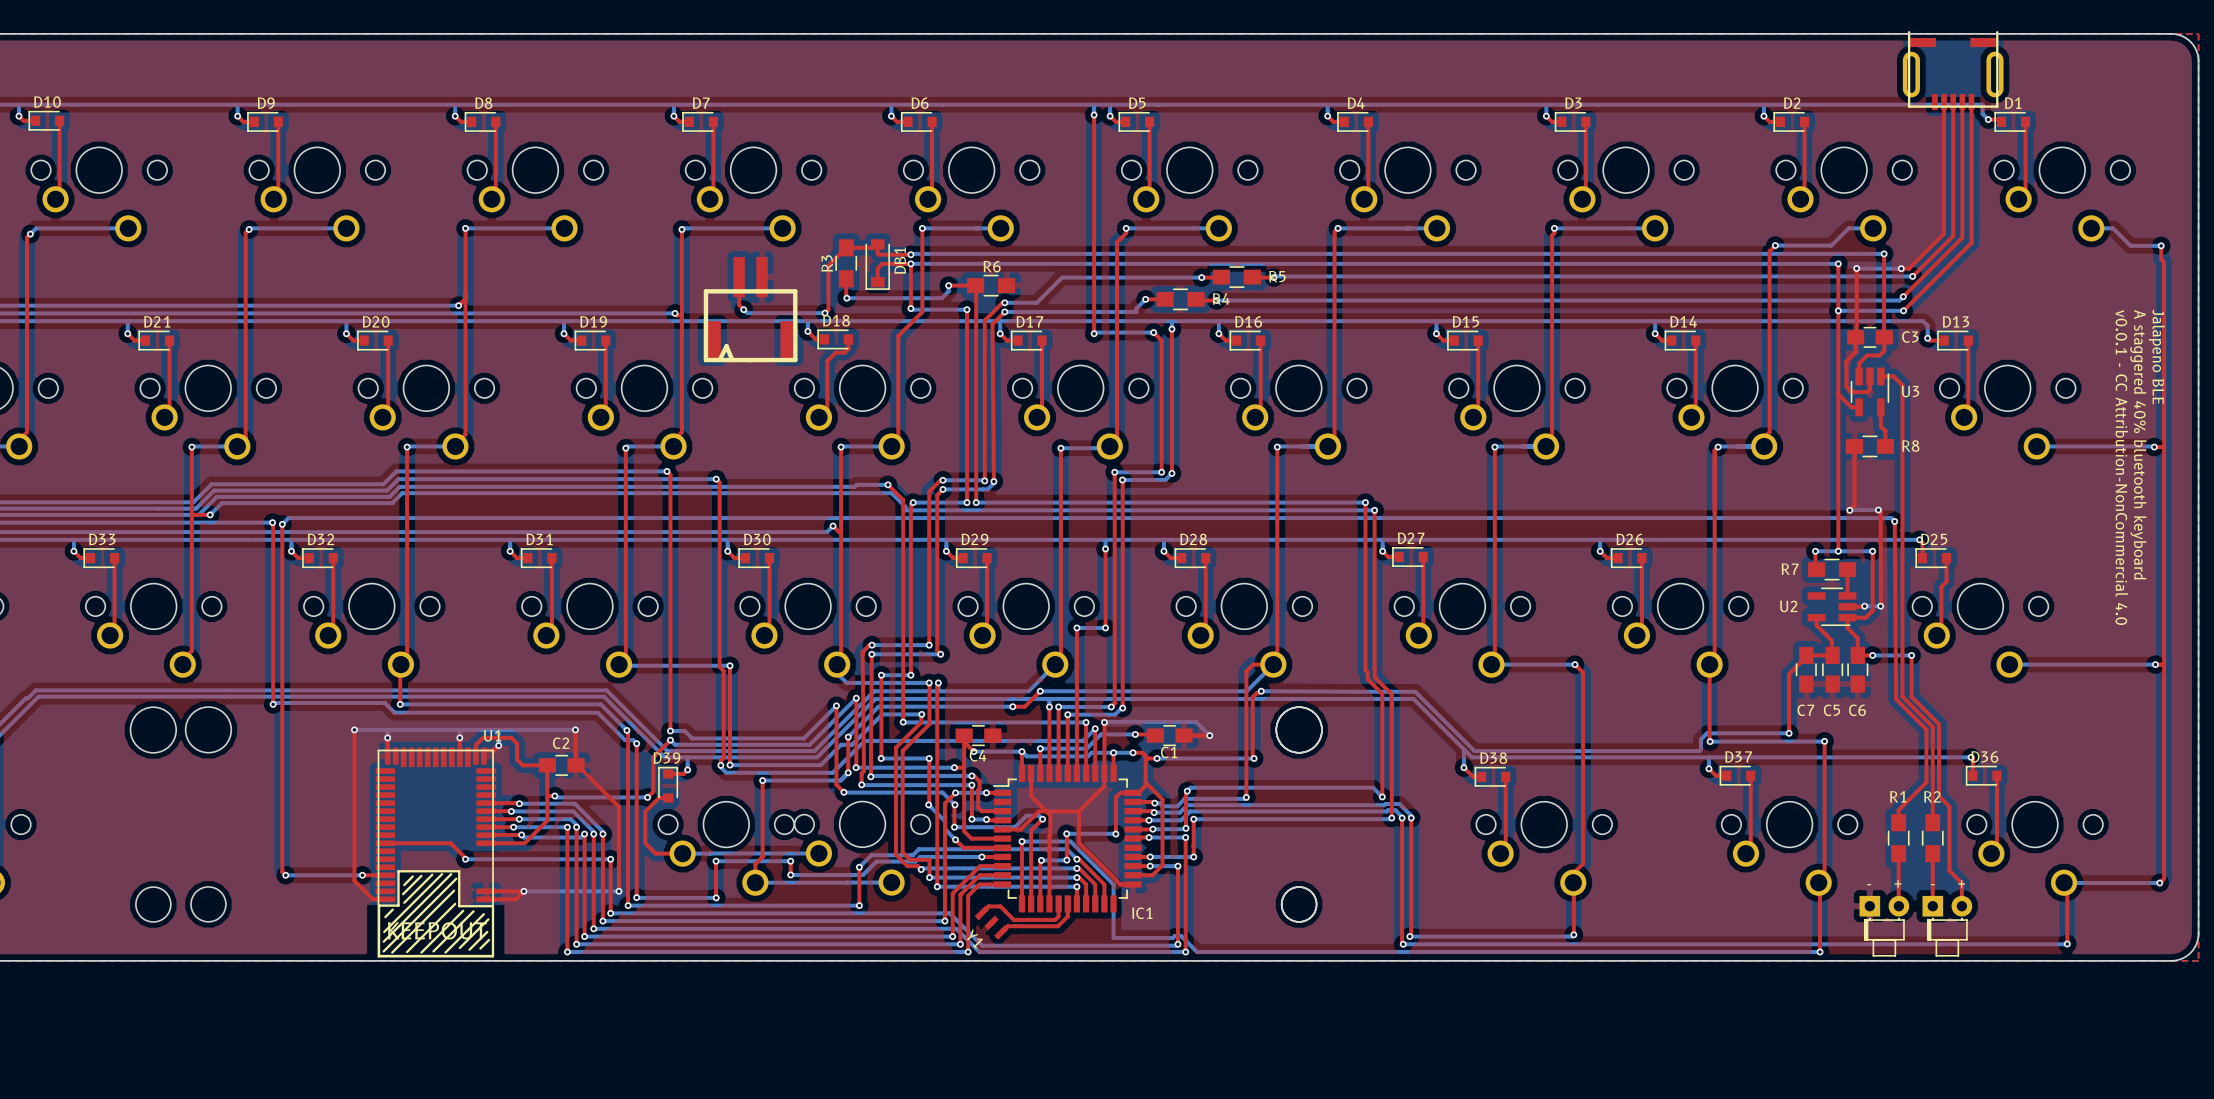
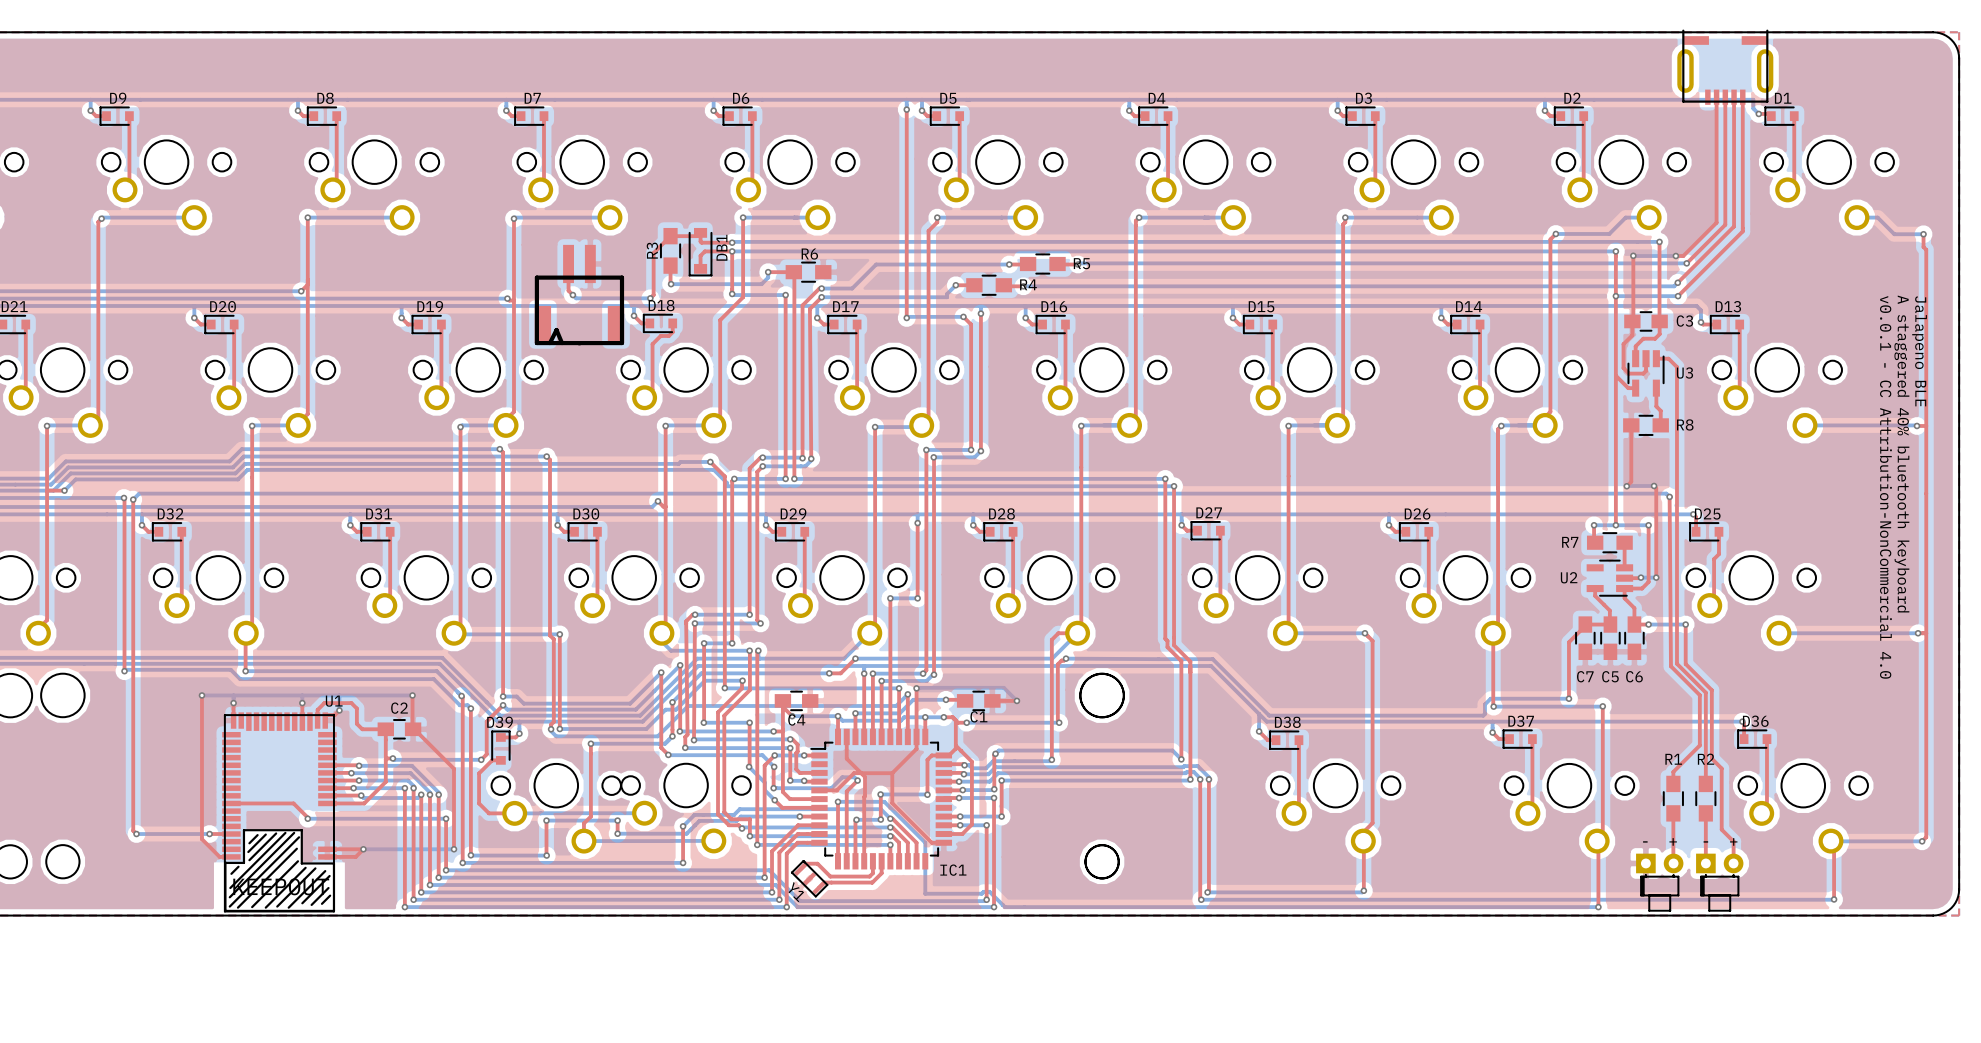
Y1 footprint: [974, 905, 1009, 940] -> [791, 860, 829, 898]

